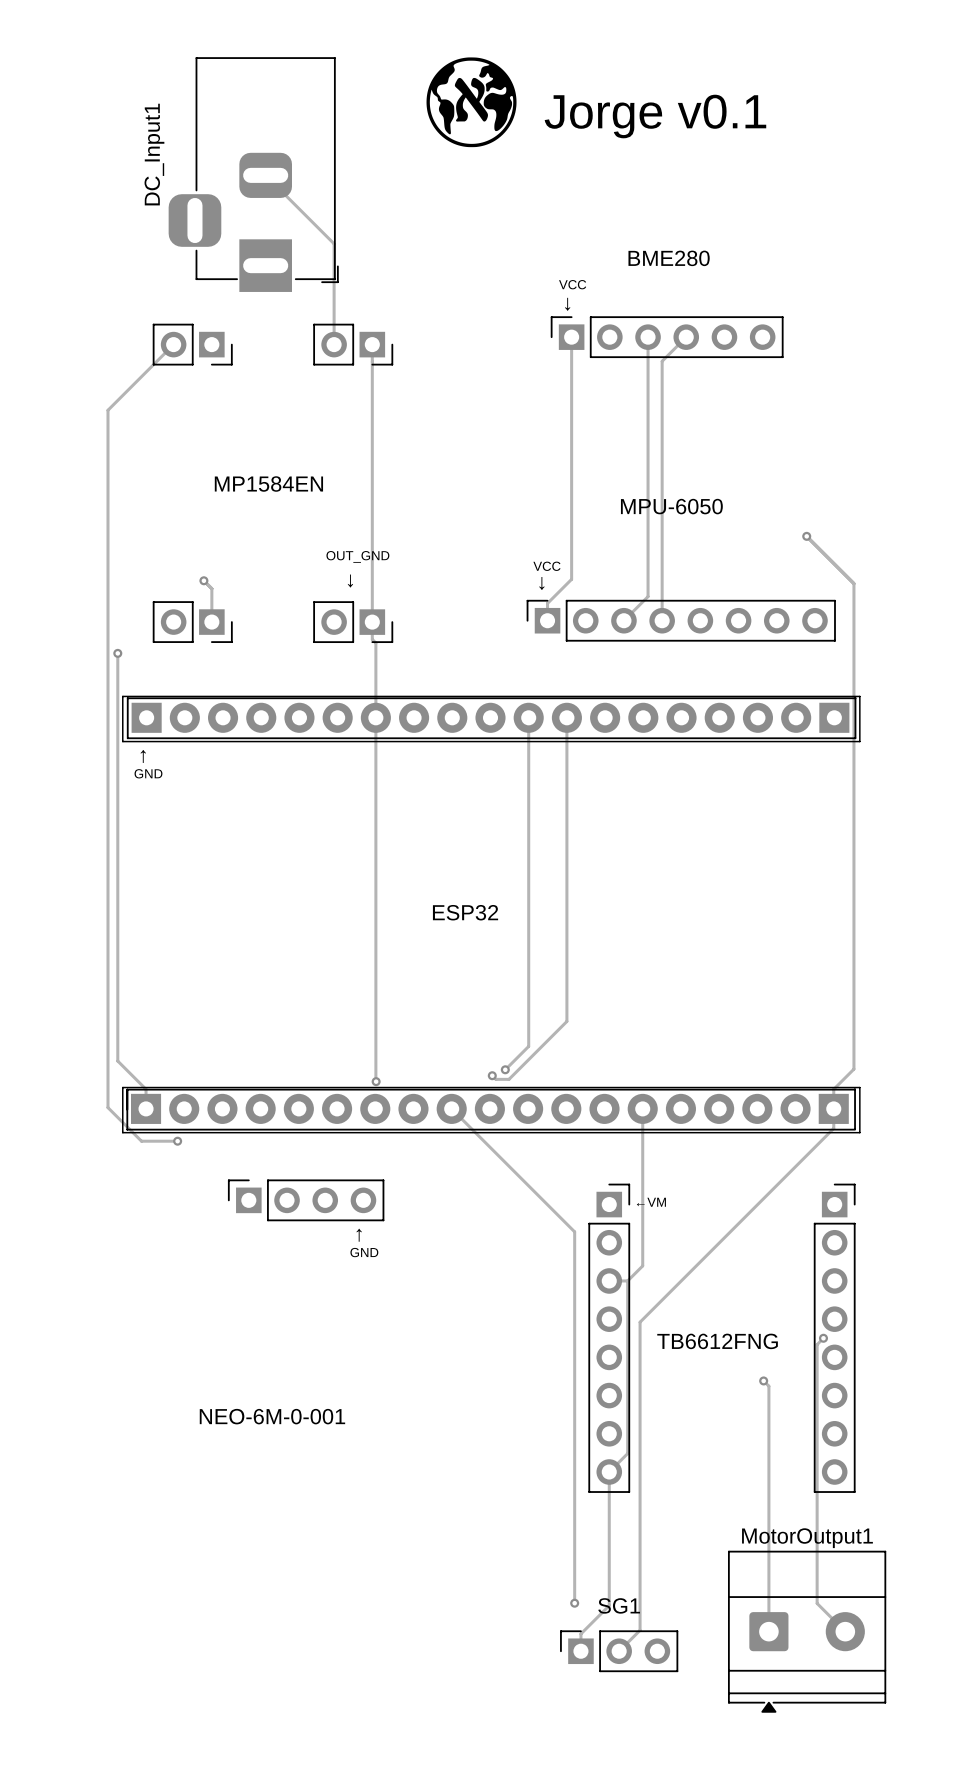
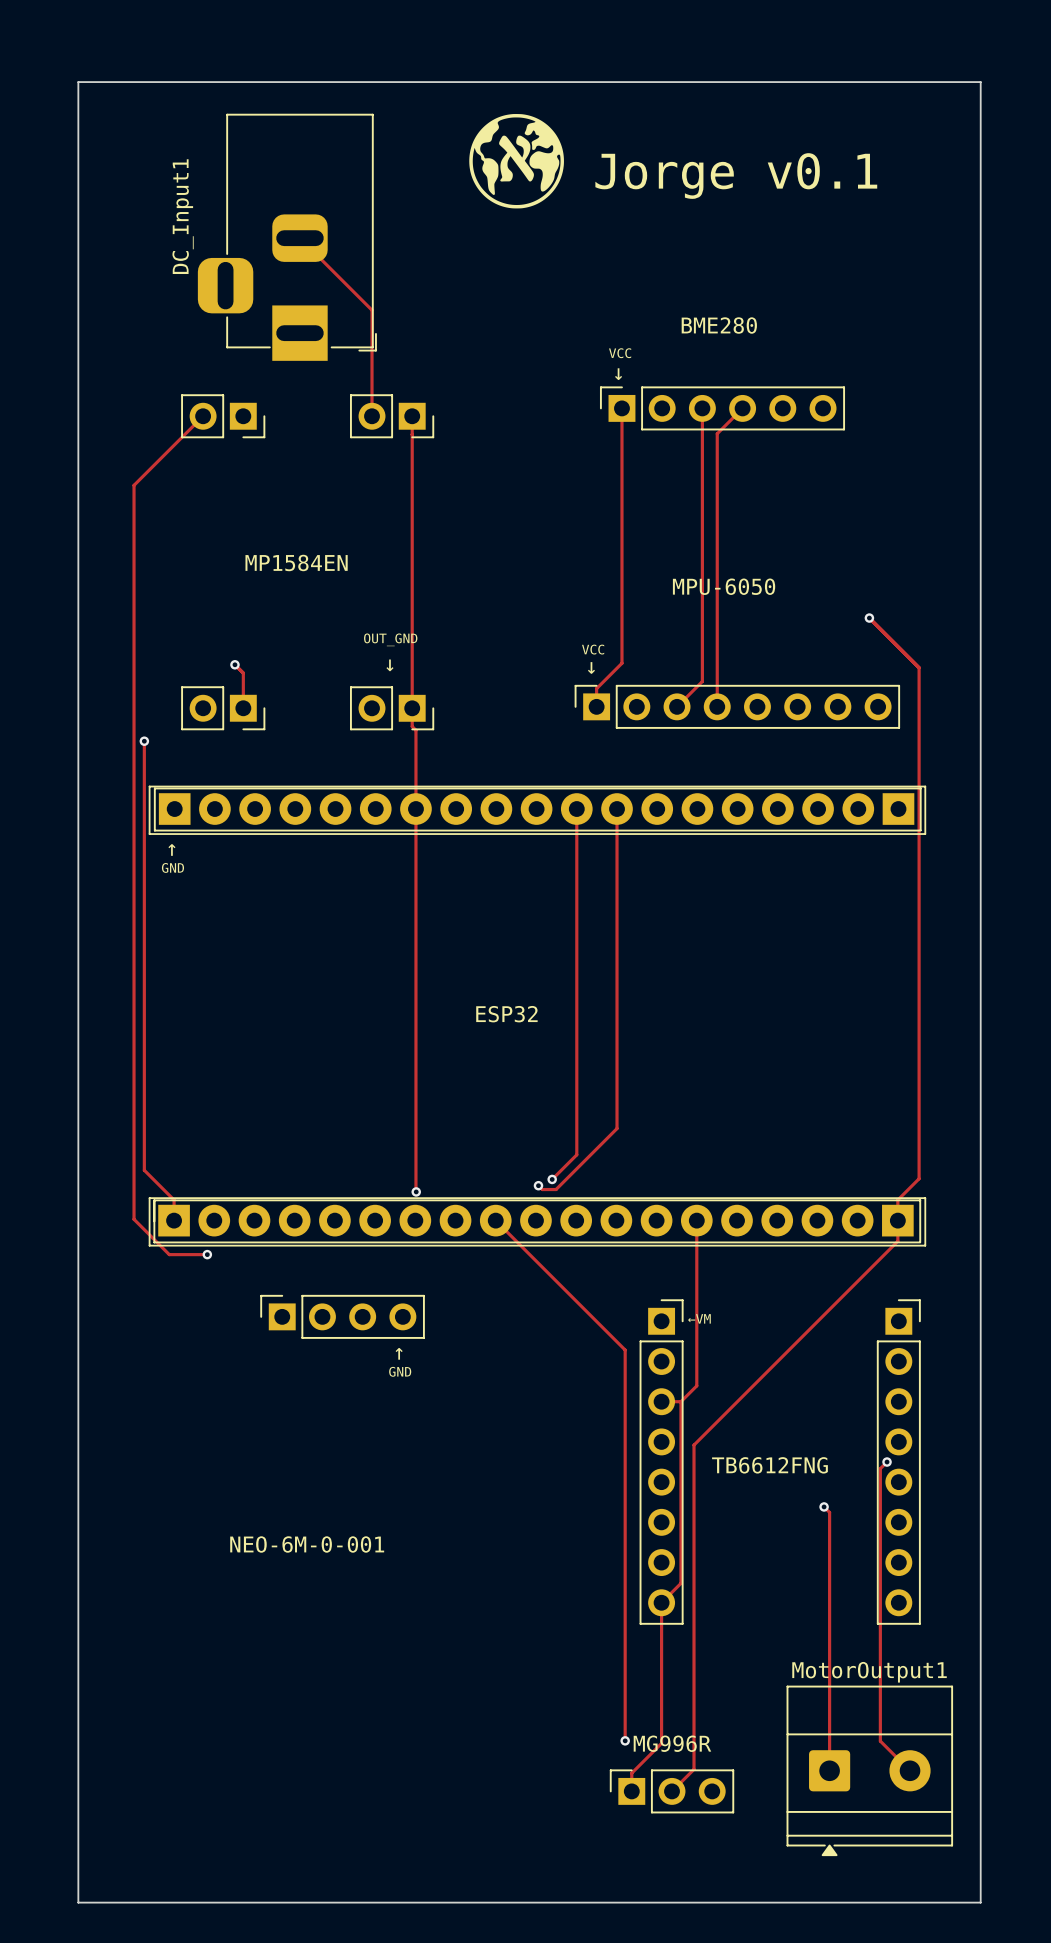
board edge: none -> (78, 82) (980, 82) (980, 1902) (78, 1902) (78, 82)
SG1 name: SG1 (619, 1605) -> MG996R (672, 1743)

